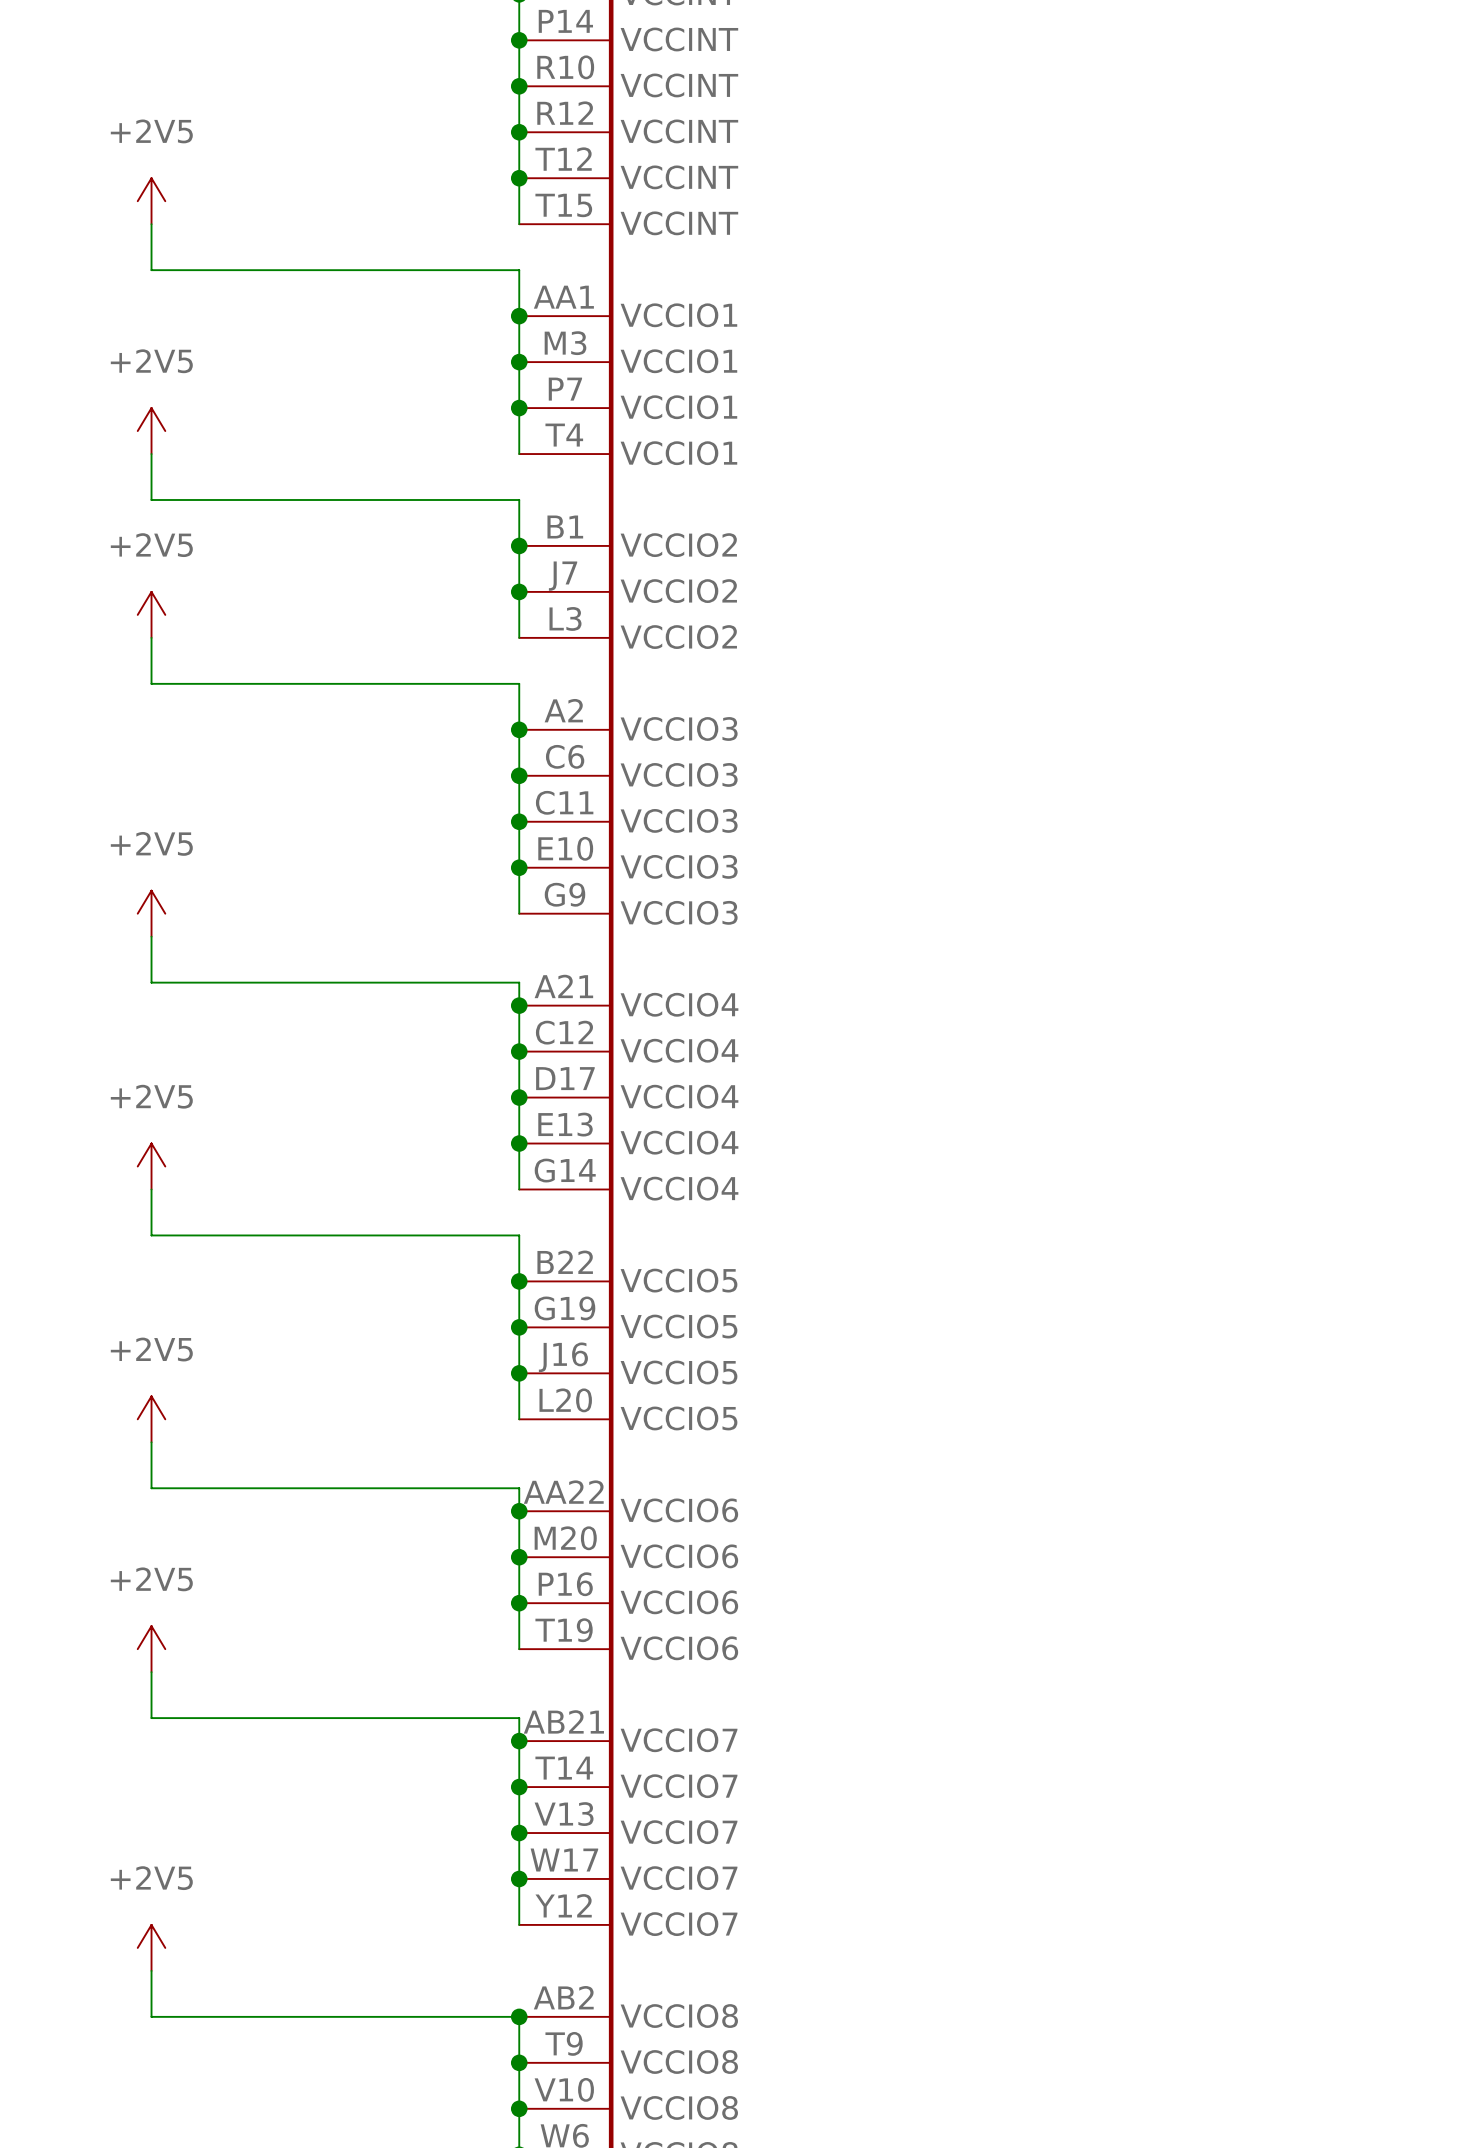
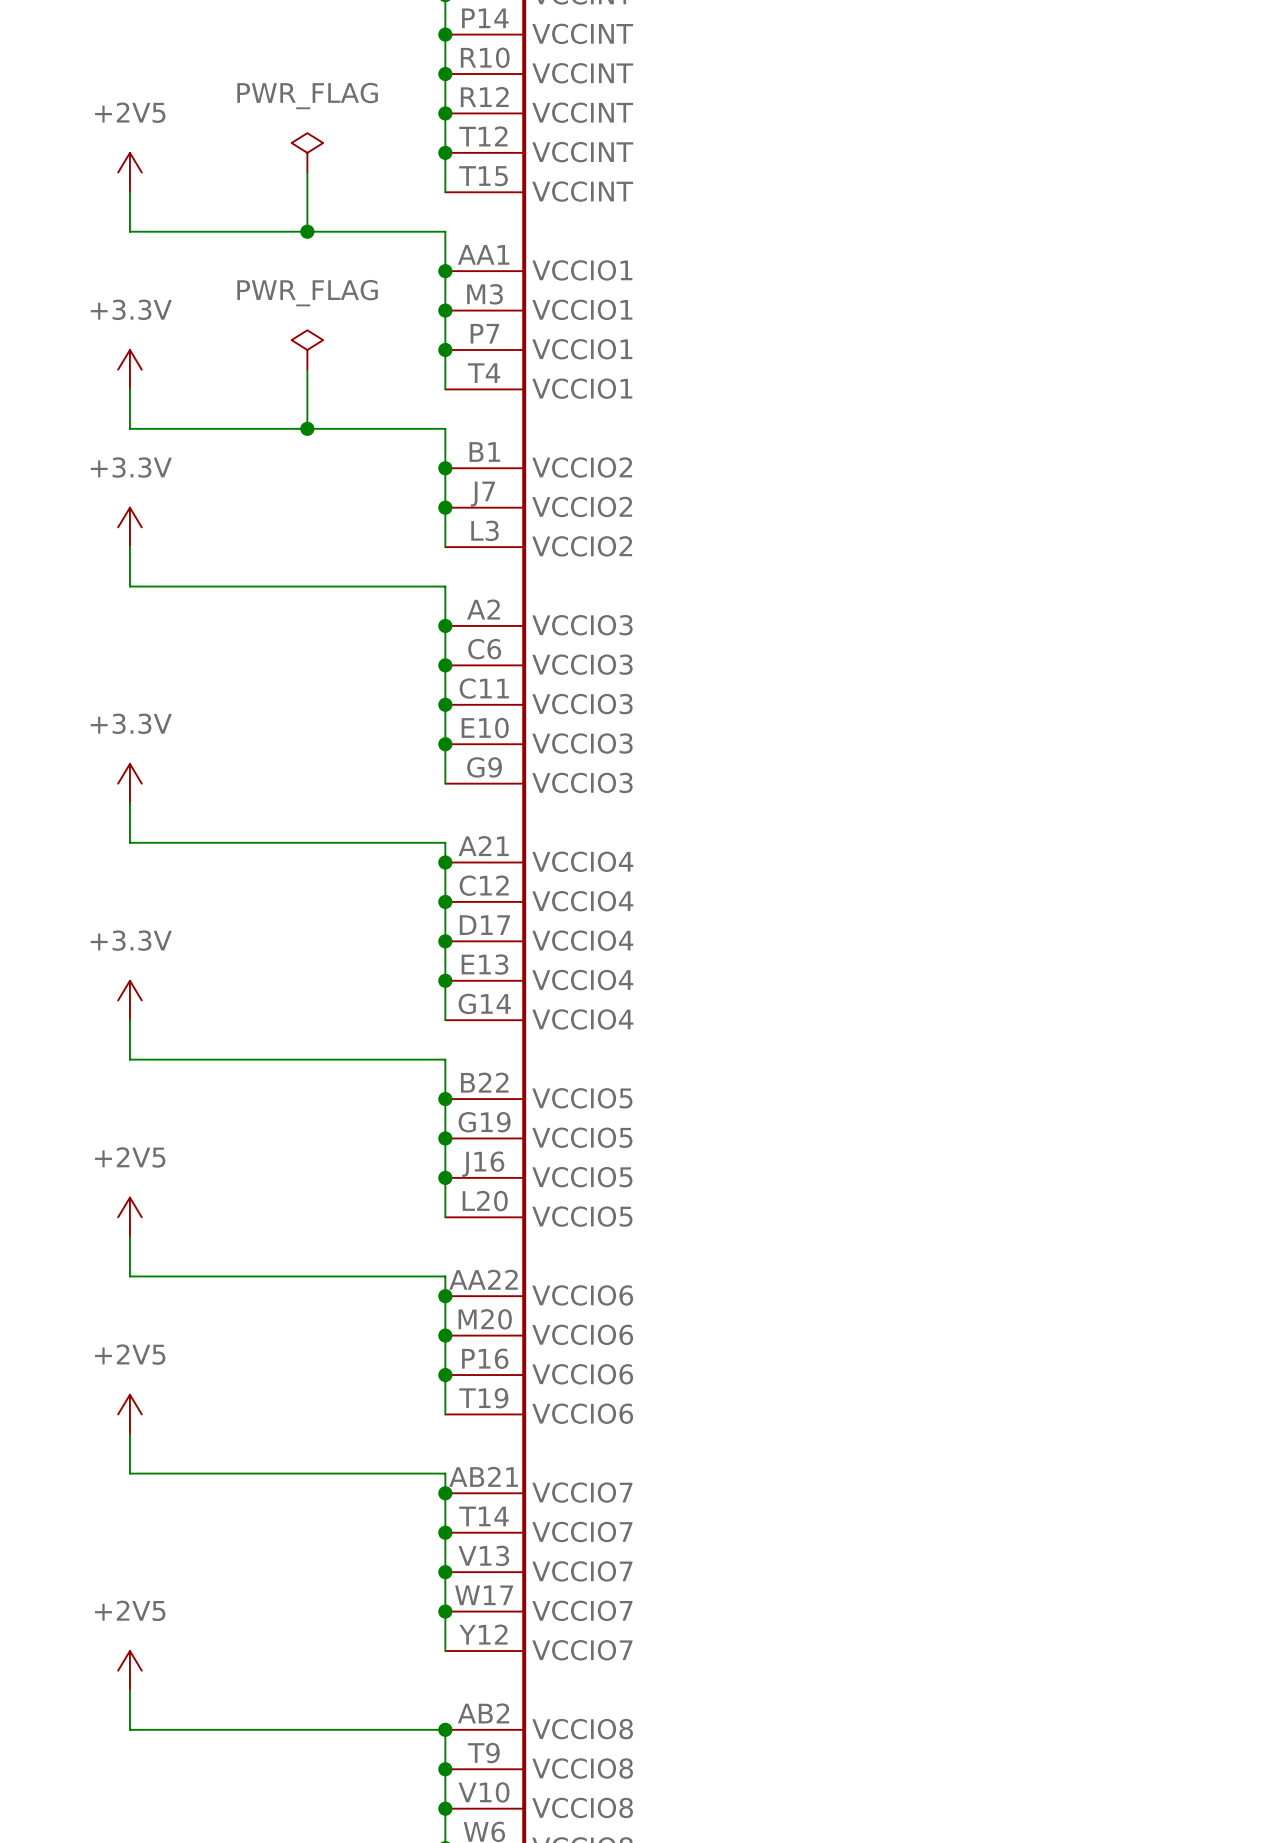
power symbol: none -> PWR_FLAG (307, 152)
wire: none -> (307, 172) (307, 231)
junction: none -> (307, 231)
power symbol: none -> PWR_FLAG (307, 349)
power symbol: +2V5 (151, 431) -> +3.3V (129, 369)
wire: none -> (307, 369) (307, 428)
junction: none -> (307, 428)
power symbol: +2V5 (151, 614) -> +3.3V (129, 527)
power symbol: +2V5 (151, 913) -> +3.3V (129, 783)
power symbol: +2V5 (151, 1166) -> +3.3V (129, 1000)

